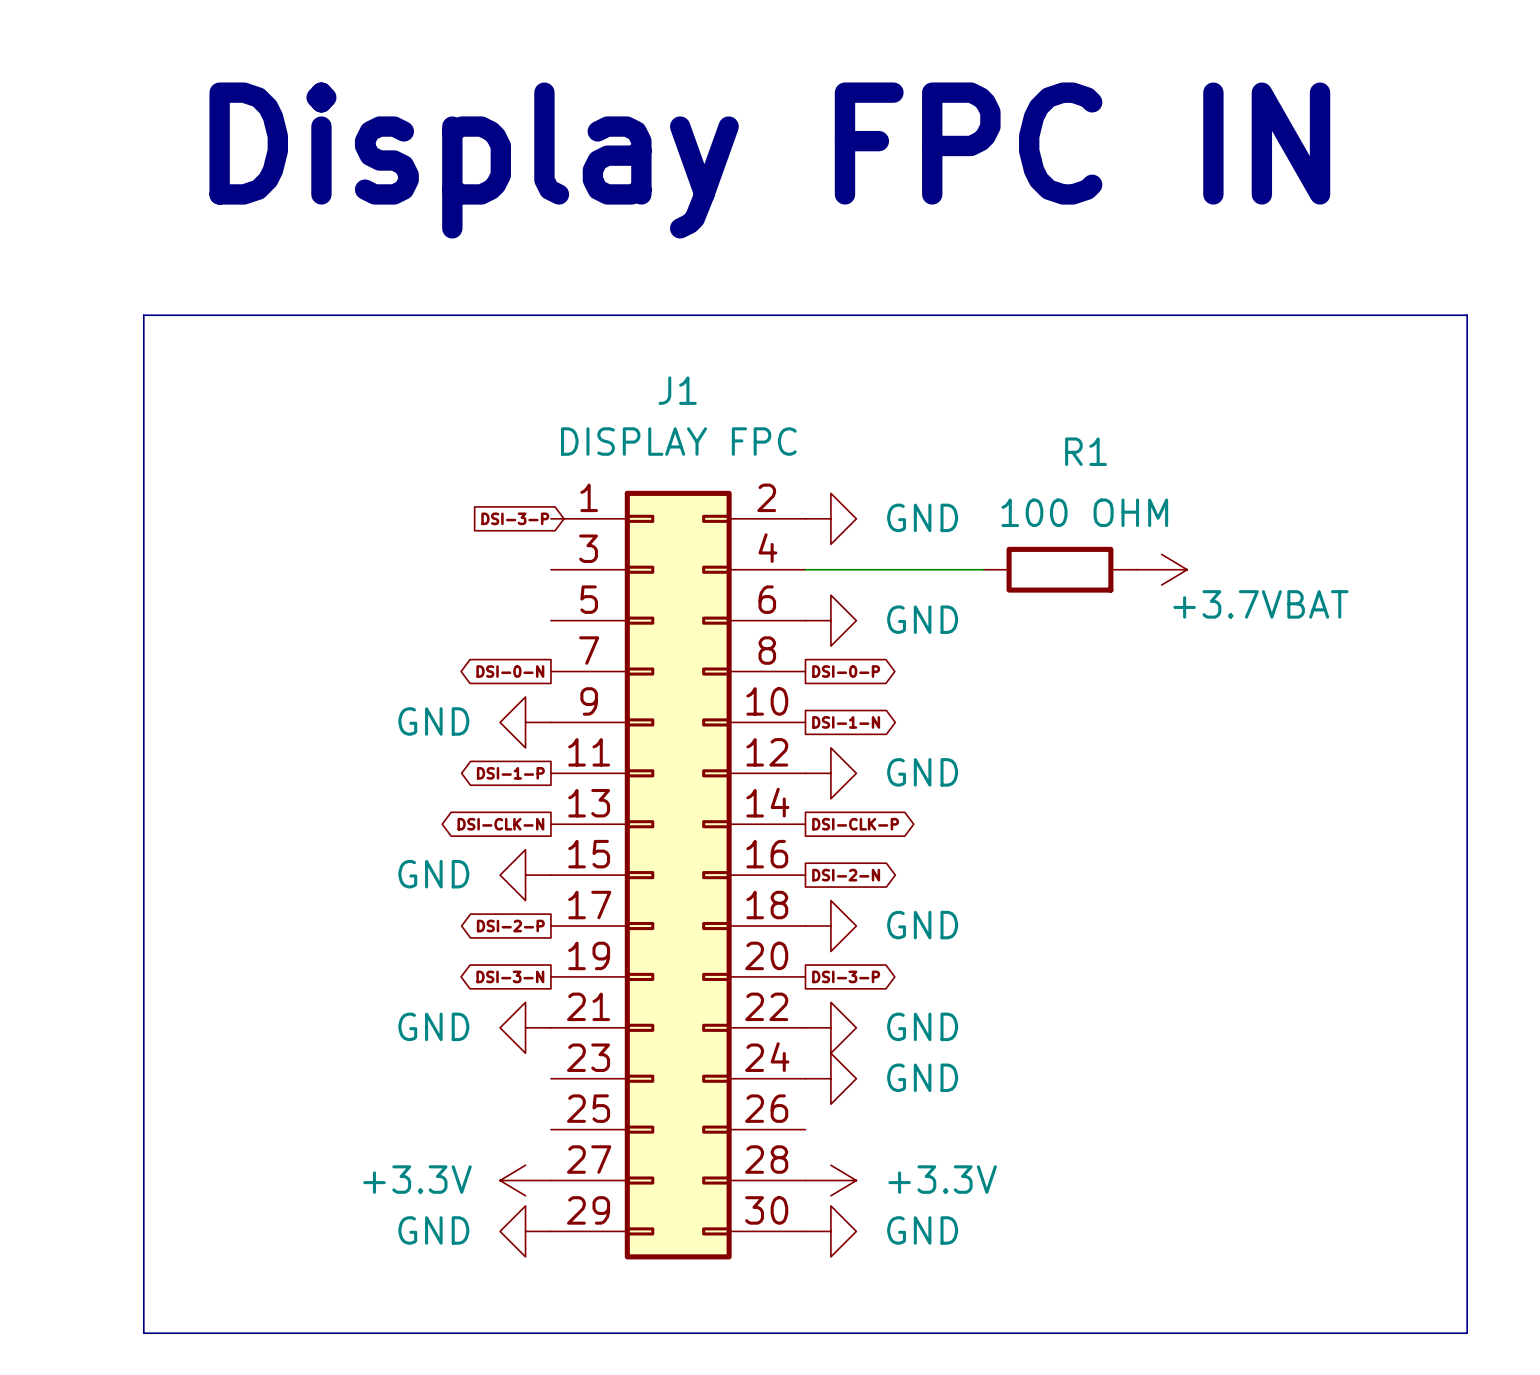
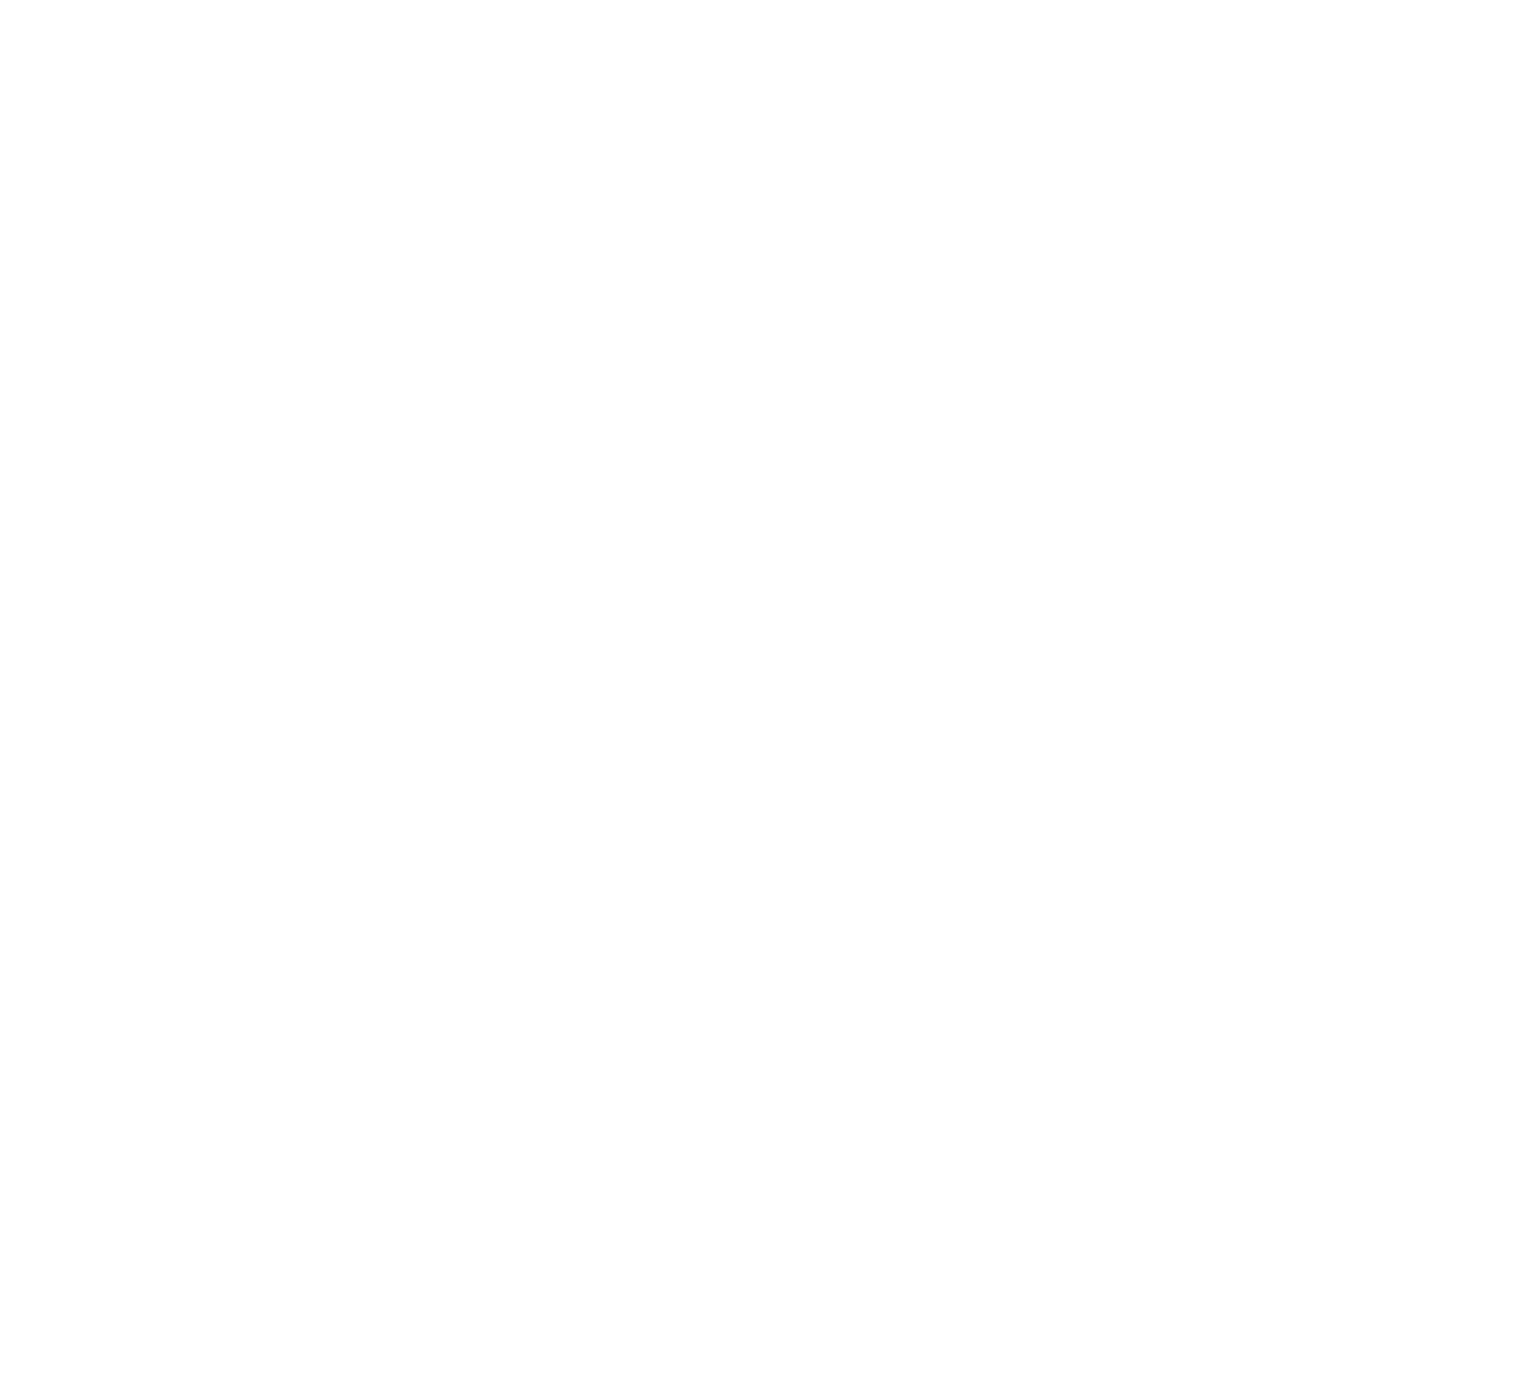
text: Display FPC IN (769, 160) -> none
line: (143, 315) (1467, 315) (1467, 1333) (143, 1333) (143, 315) -> none
global label: DSI-3-P (515, 518) -> none
power symbol: GND (830, 518) -> none
wire: (805, 569) (983, 569) -> none
R1: 100 OHM (1059, 569) -> none
power symbol: +3.7VBAT (1161, 569) -> none
power symbol: GND (830, 620) -> none
global label: DSI-0-N (510, 671) -> none
global label: DSI-0-P (846, 671) -> none
power symbol: GND (525, 722) -> none
global label: DSI-1-N (846, 722) -> none
global label: DSI-1-P (510, 773) -> none
power symbol: GND (830, 773) -> none
global label: DSI-CLK-N (500, 824) -> none
global label: DSI-CLK-P (855, 824) -> none
power symbol: GND (525, 875) -> none
J1: DISPLAY FPC (678, 875) -> none
global label: DSI-2-N (846, 875) -> none
global label: DSI-2-P (510, 926) -> none
power symbol: GND (830, 926) -> none
global label: DSI-3-N (510, 976) -> none
global label: DSI-3-P (846, 976) -> none
power symbol: GND (525, 1027) -> none
power symbol: GND (830, 1027) -> none
power symbol: GND (830, 1078) -> none
power symbol: +3.3V (525, 1180) -> none
power symbol: +3.3V (830, 1180) -> none
power symbol: GND (525, 1231) -> none
power symbol: GND (830, 1231) -> none

